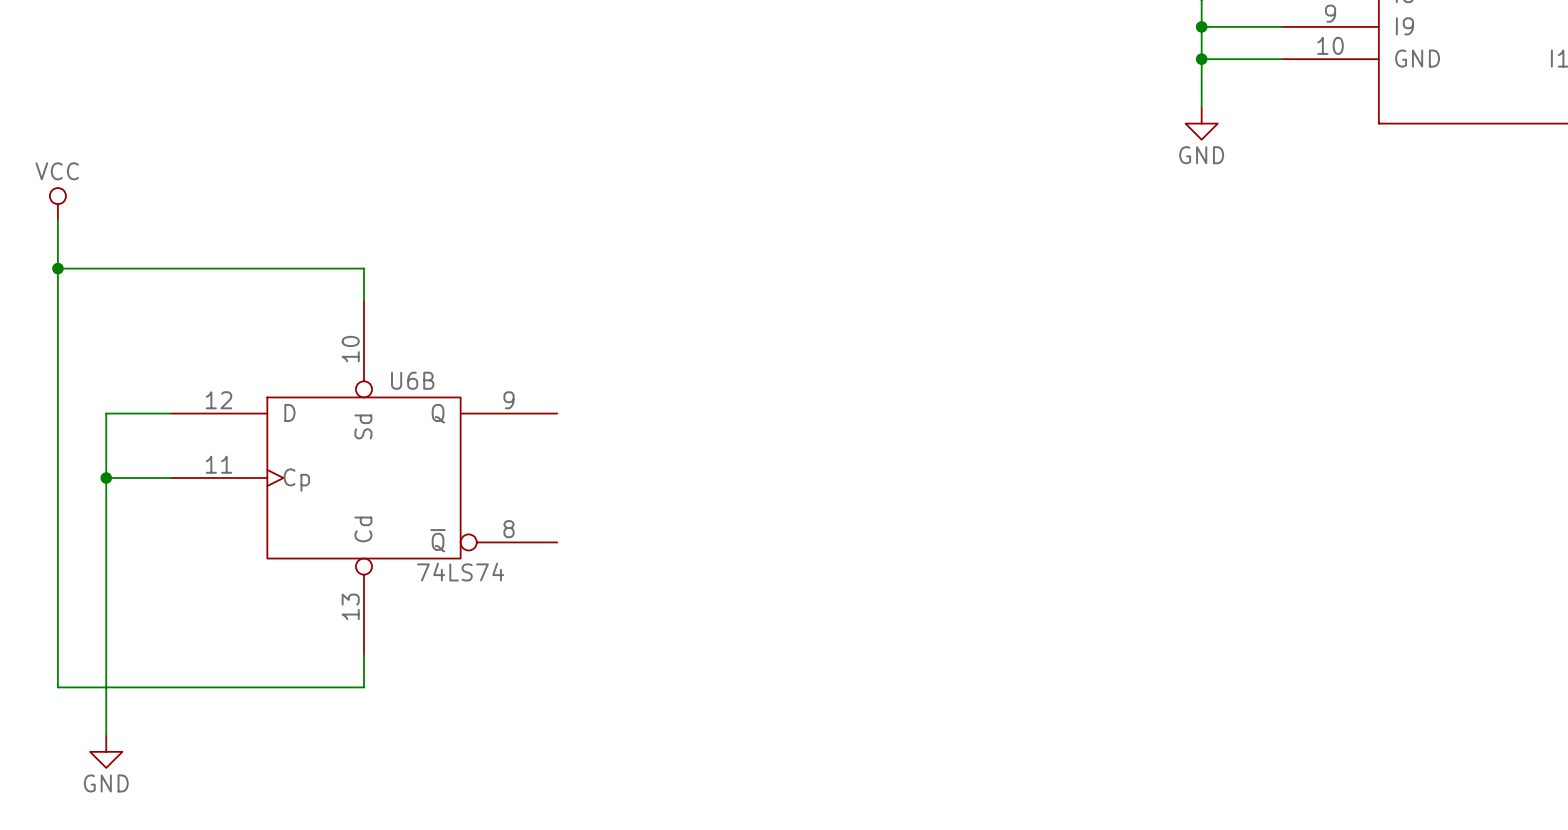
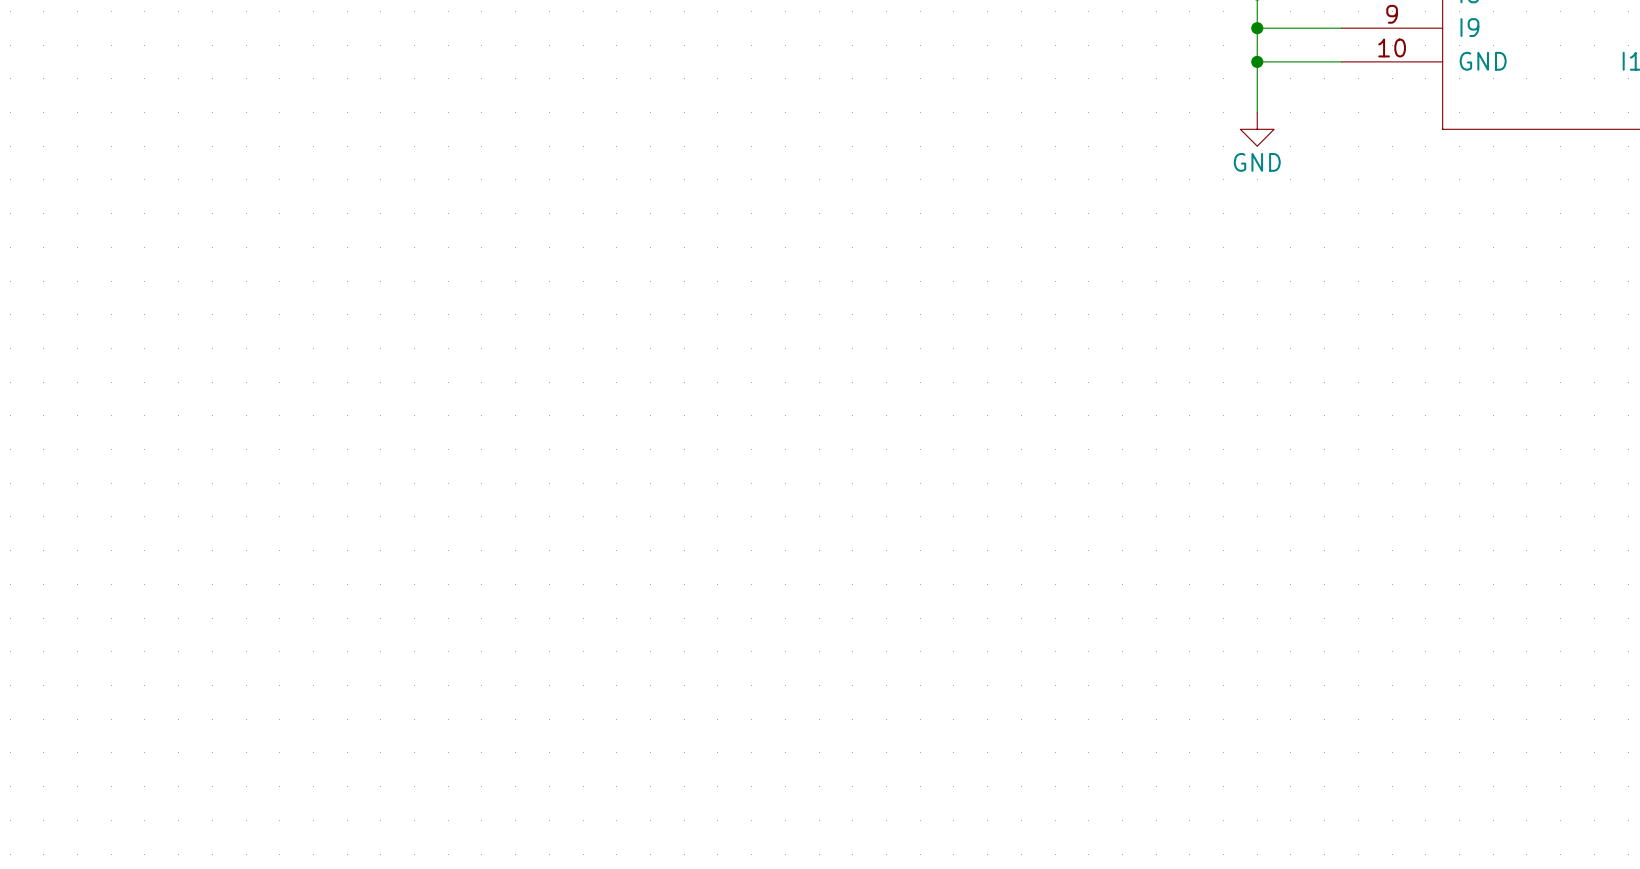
power symbol: VCC (57, 204) -> none
wire: (57, 220) (57, 687) (363, 687) (363, 655) -> none
wire: (57, 268) (363, 268) (363, 300) -> none
junction: (57, 268) -> none
wire: (170, 413) (106, 413) (106, 735) -> none
wire: (106, 477) (170, 477) -> none
junction: (106, 477) -> none
U6B: 74LS74 (363, 477) -> none
power symbol: GND (106, 751) -> none

